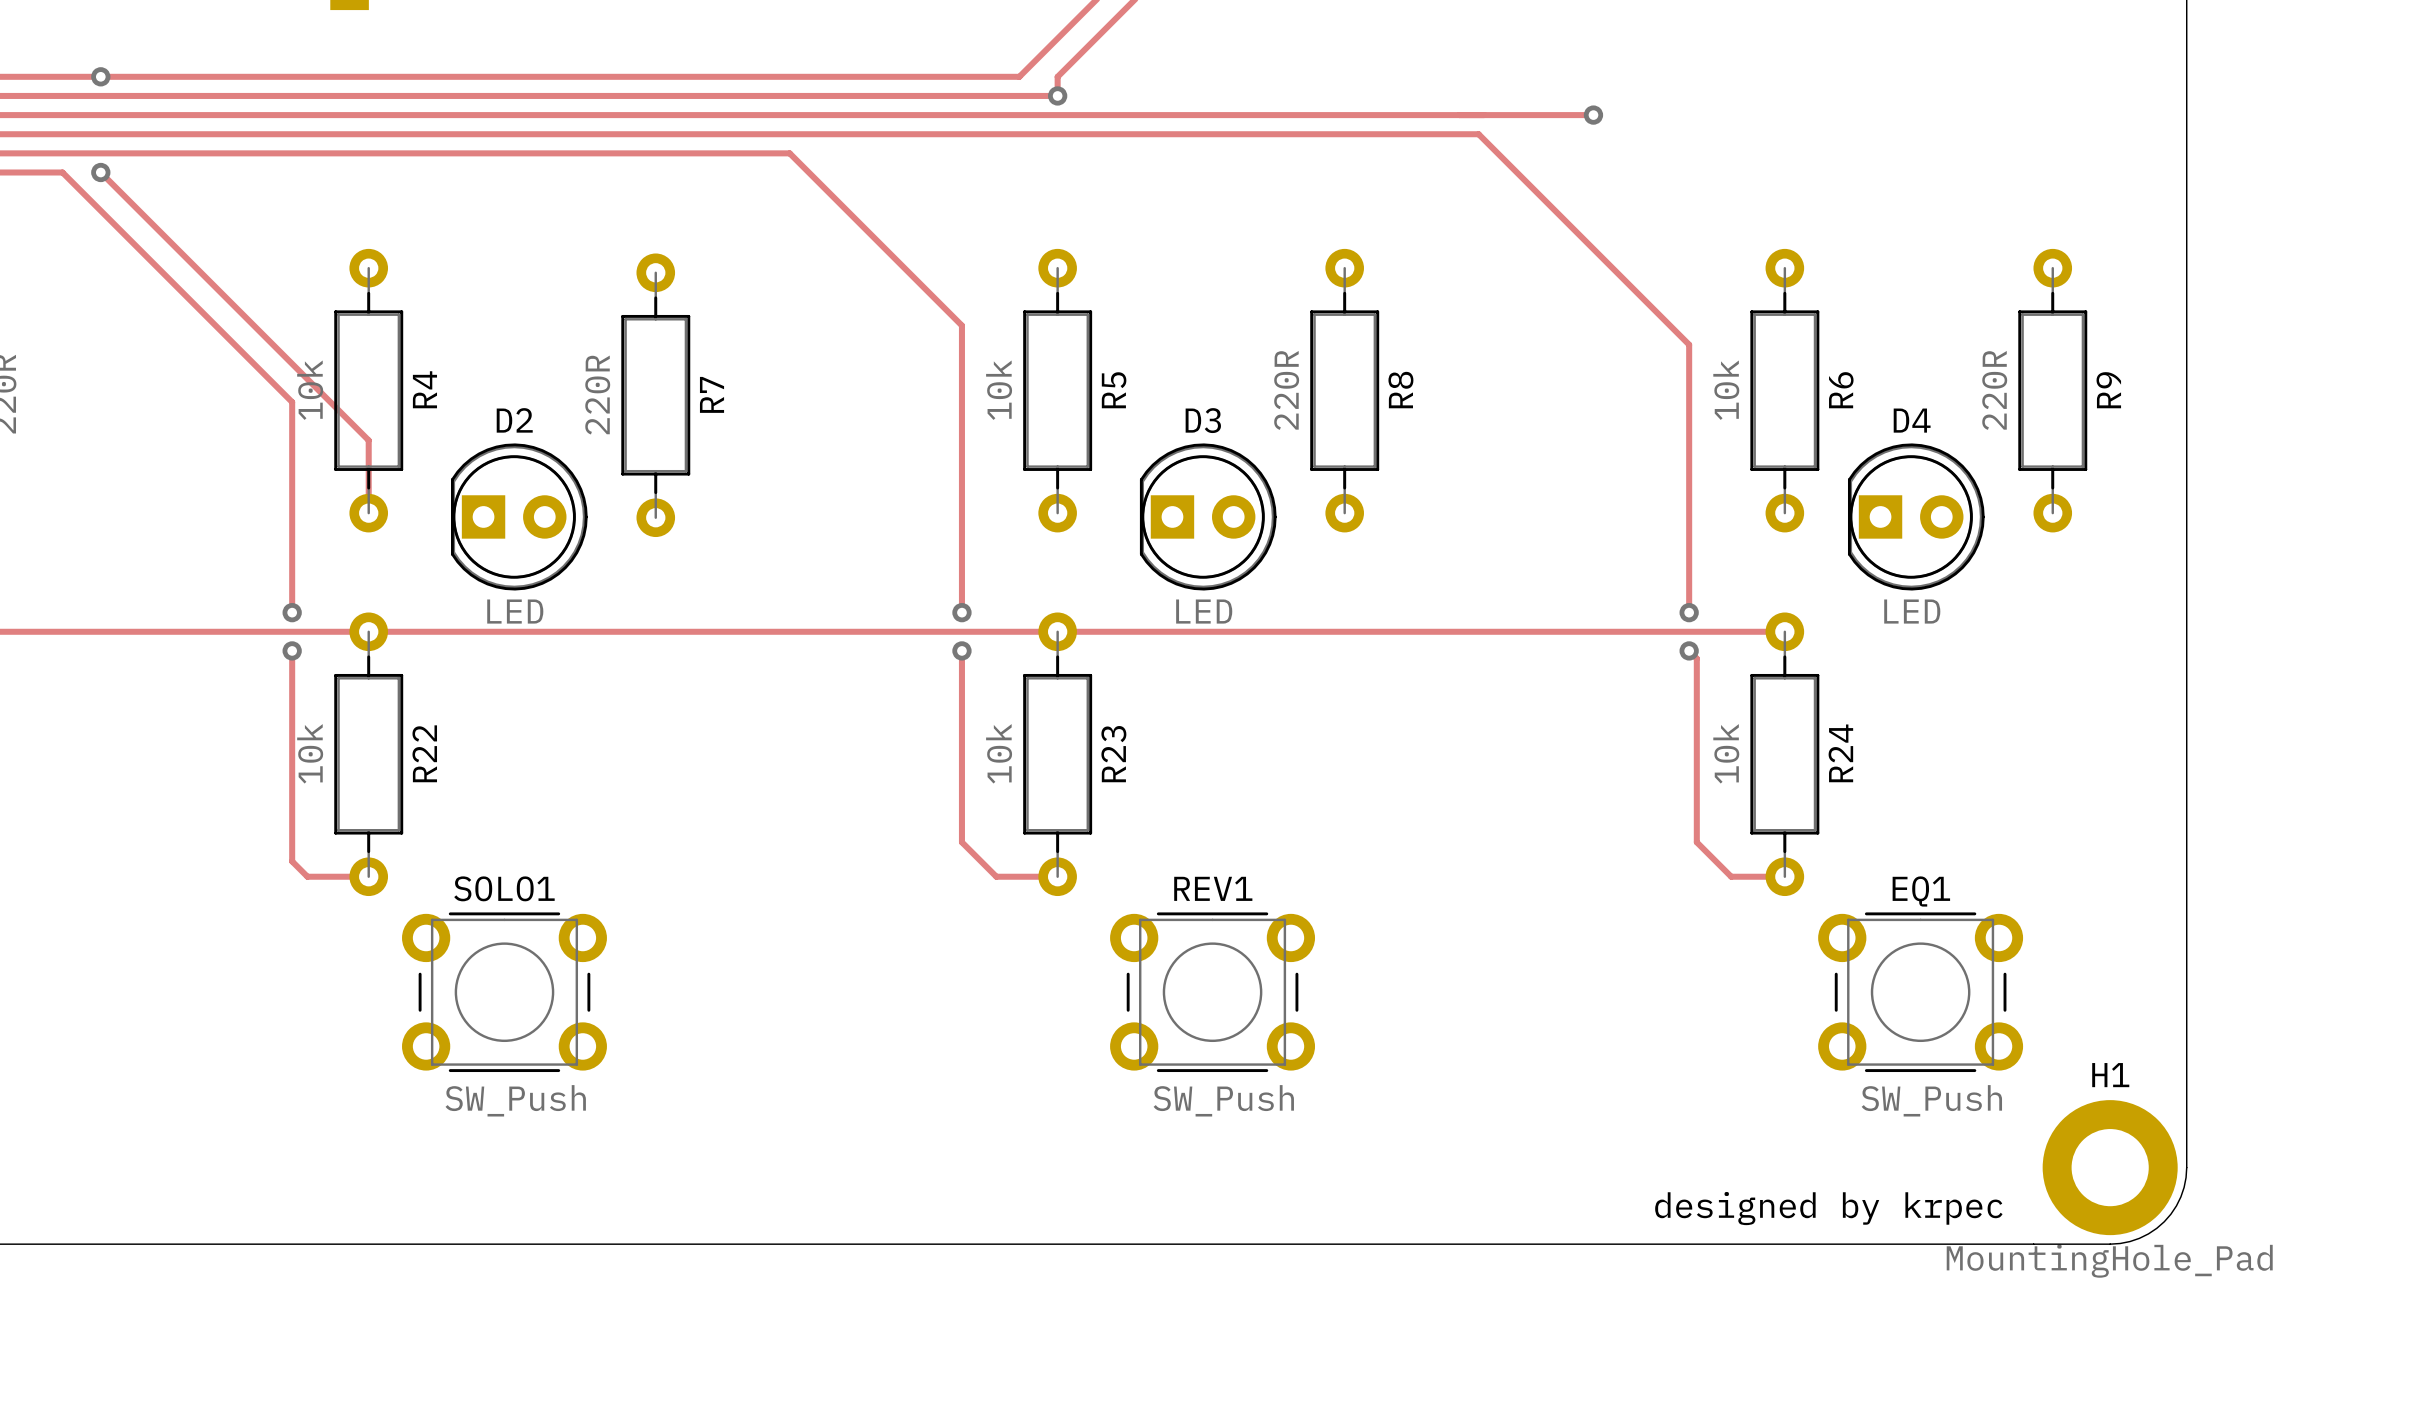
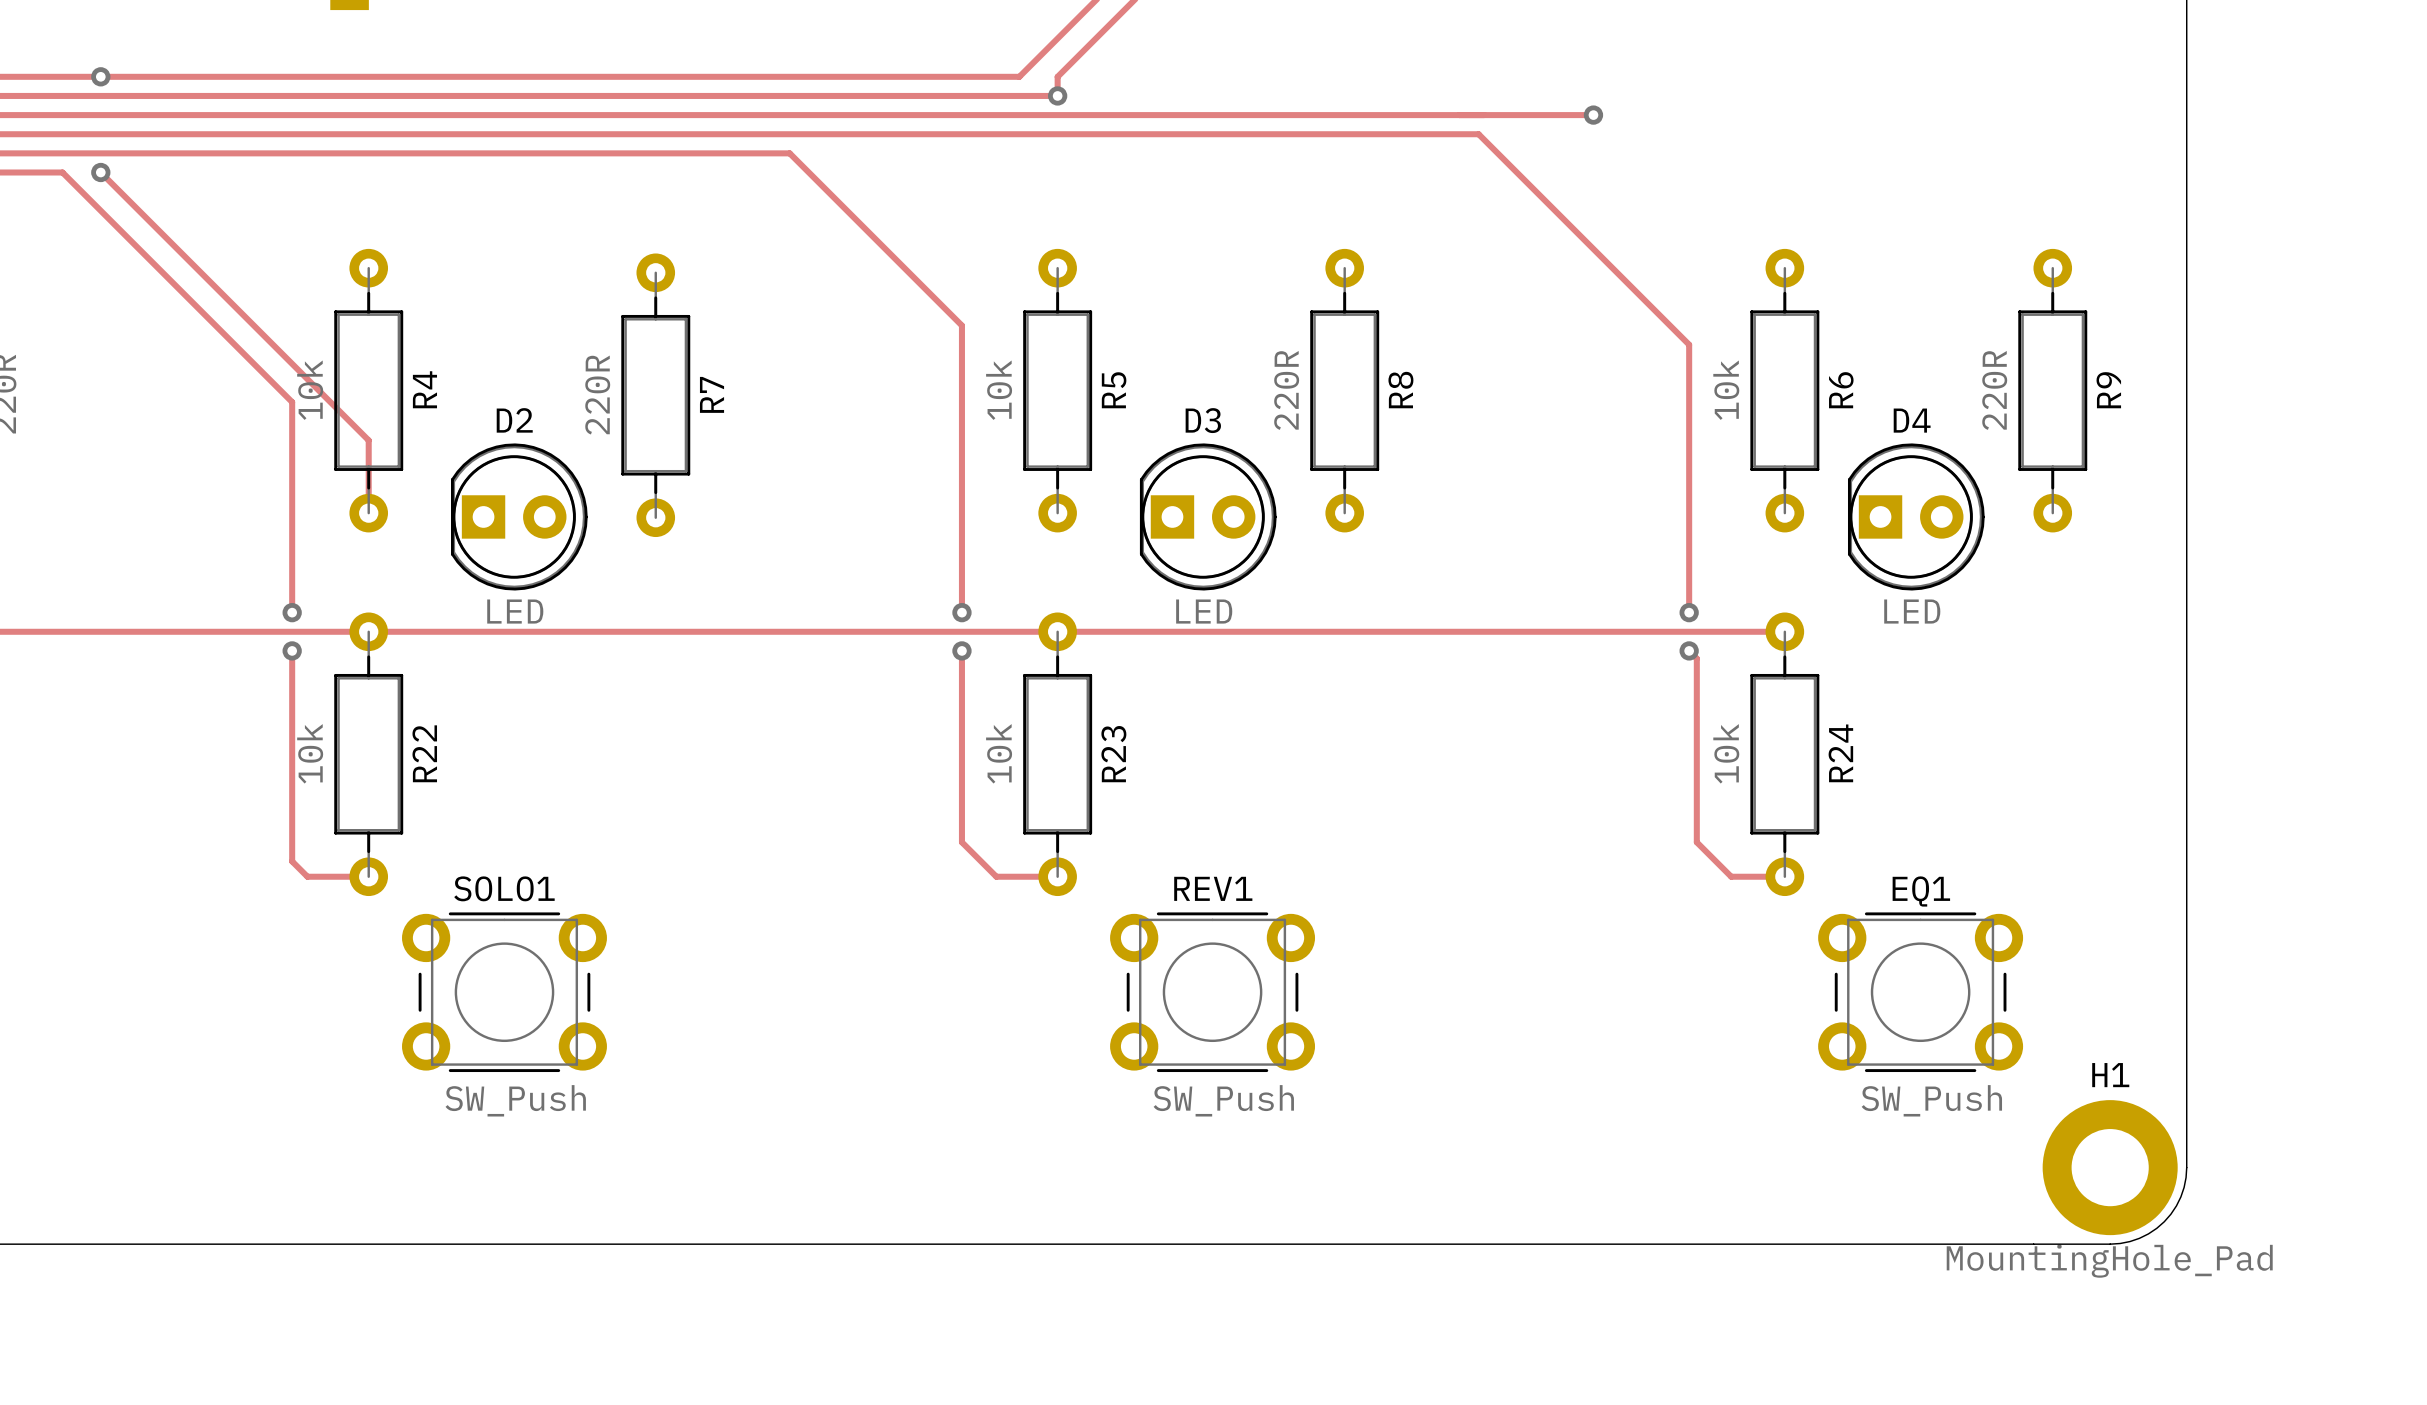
text: designed by krpec (1828, 1208) -> none

